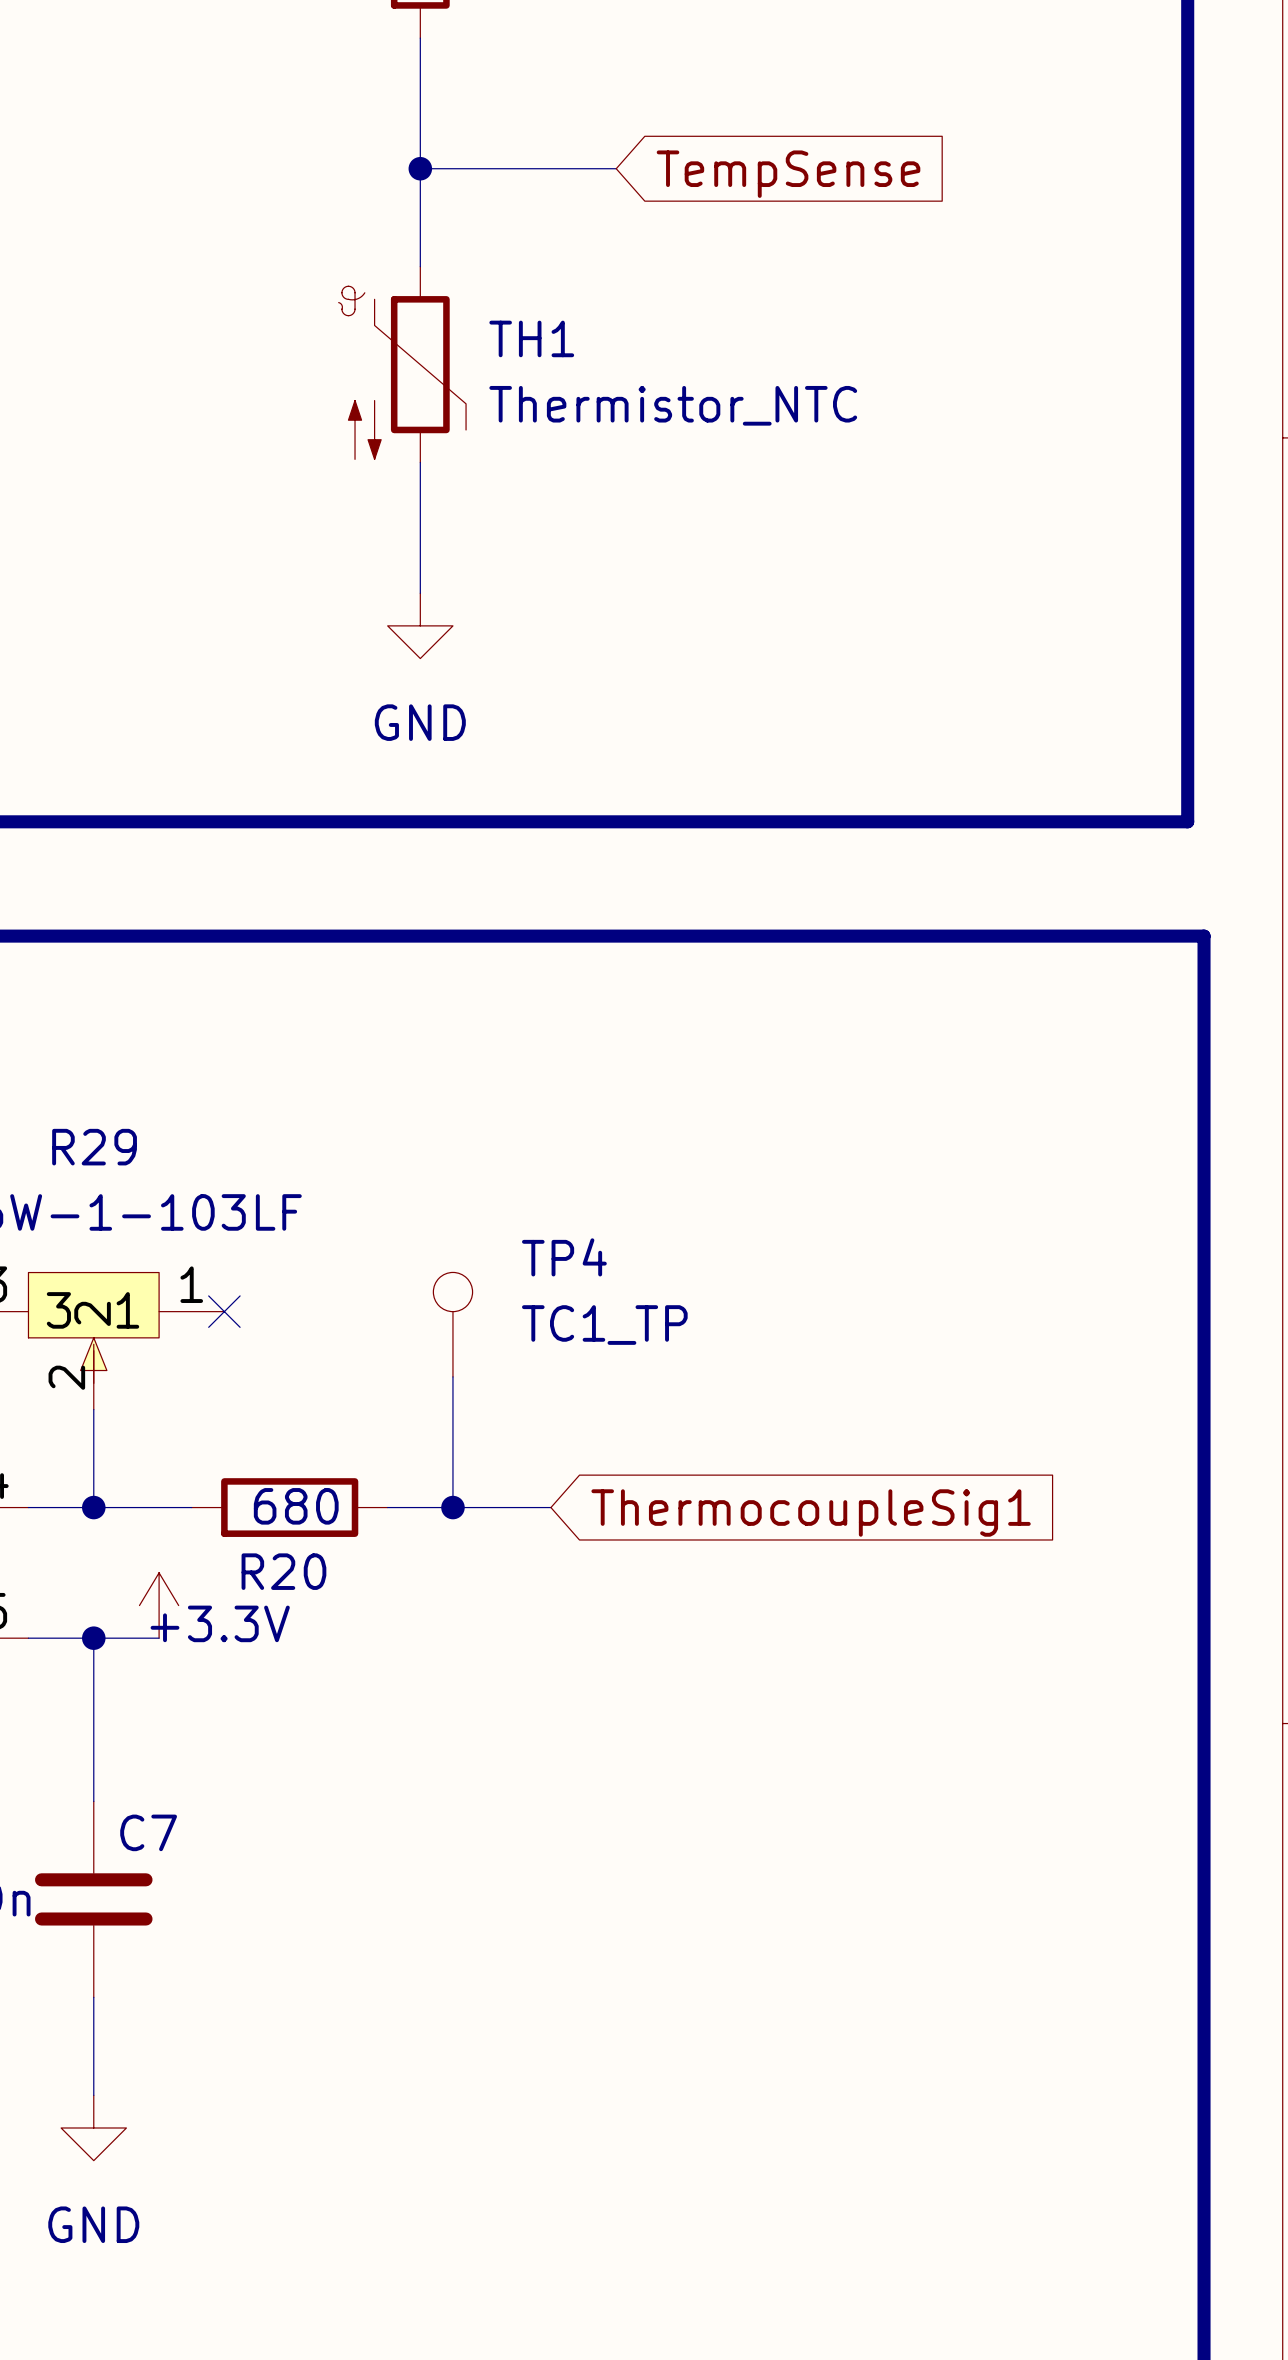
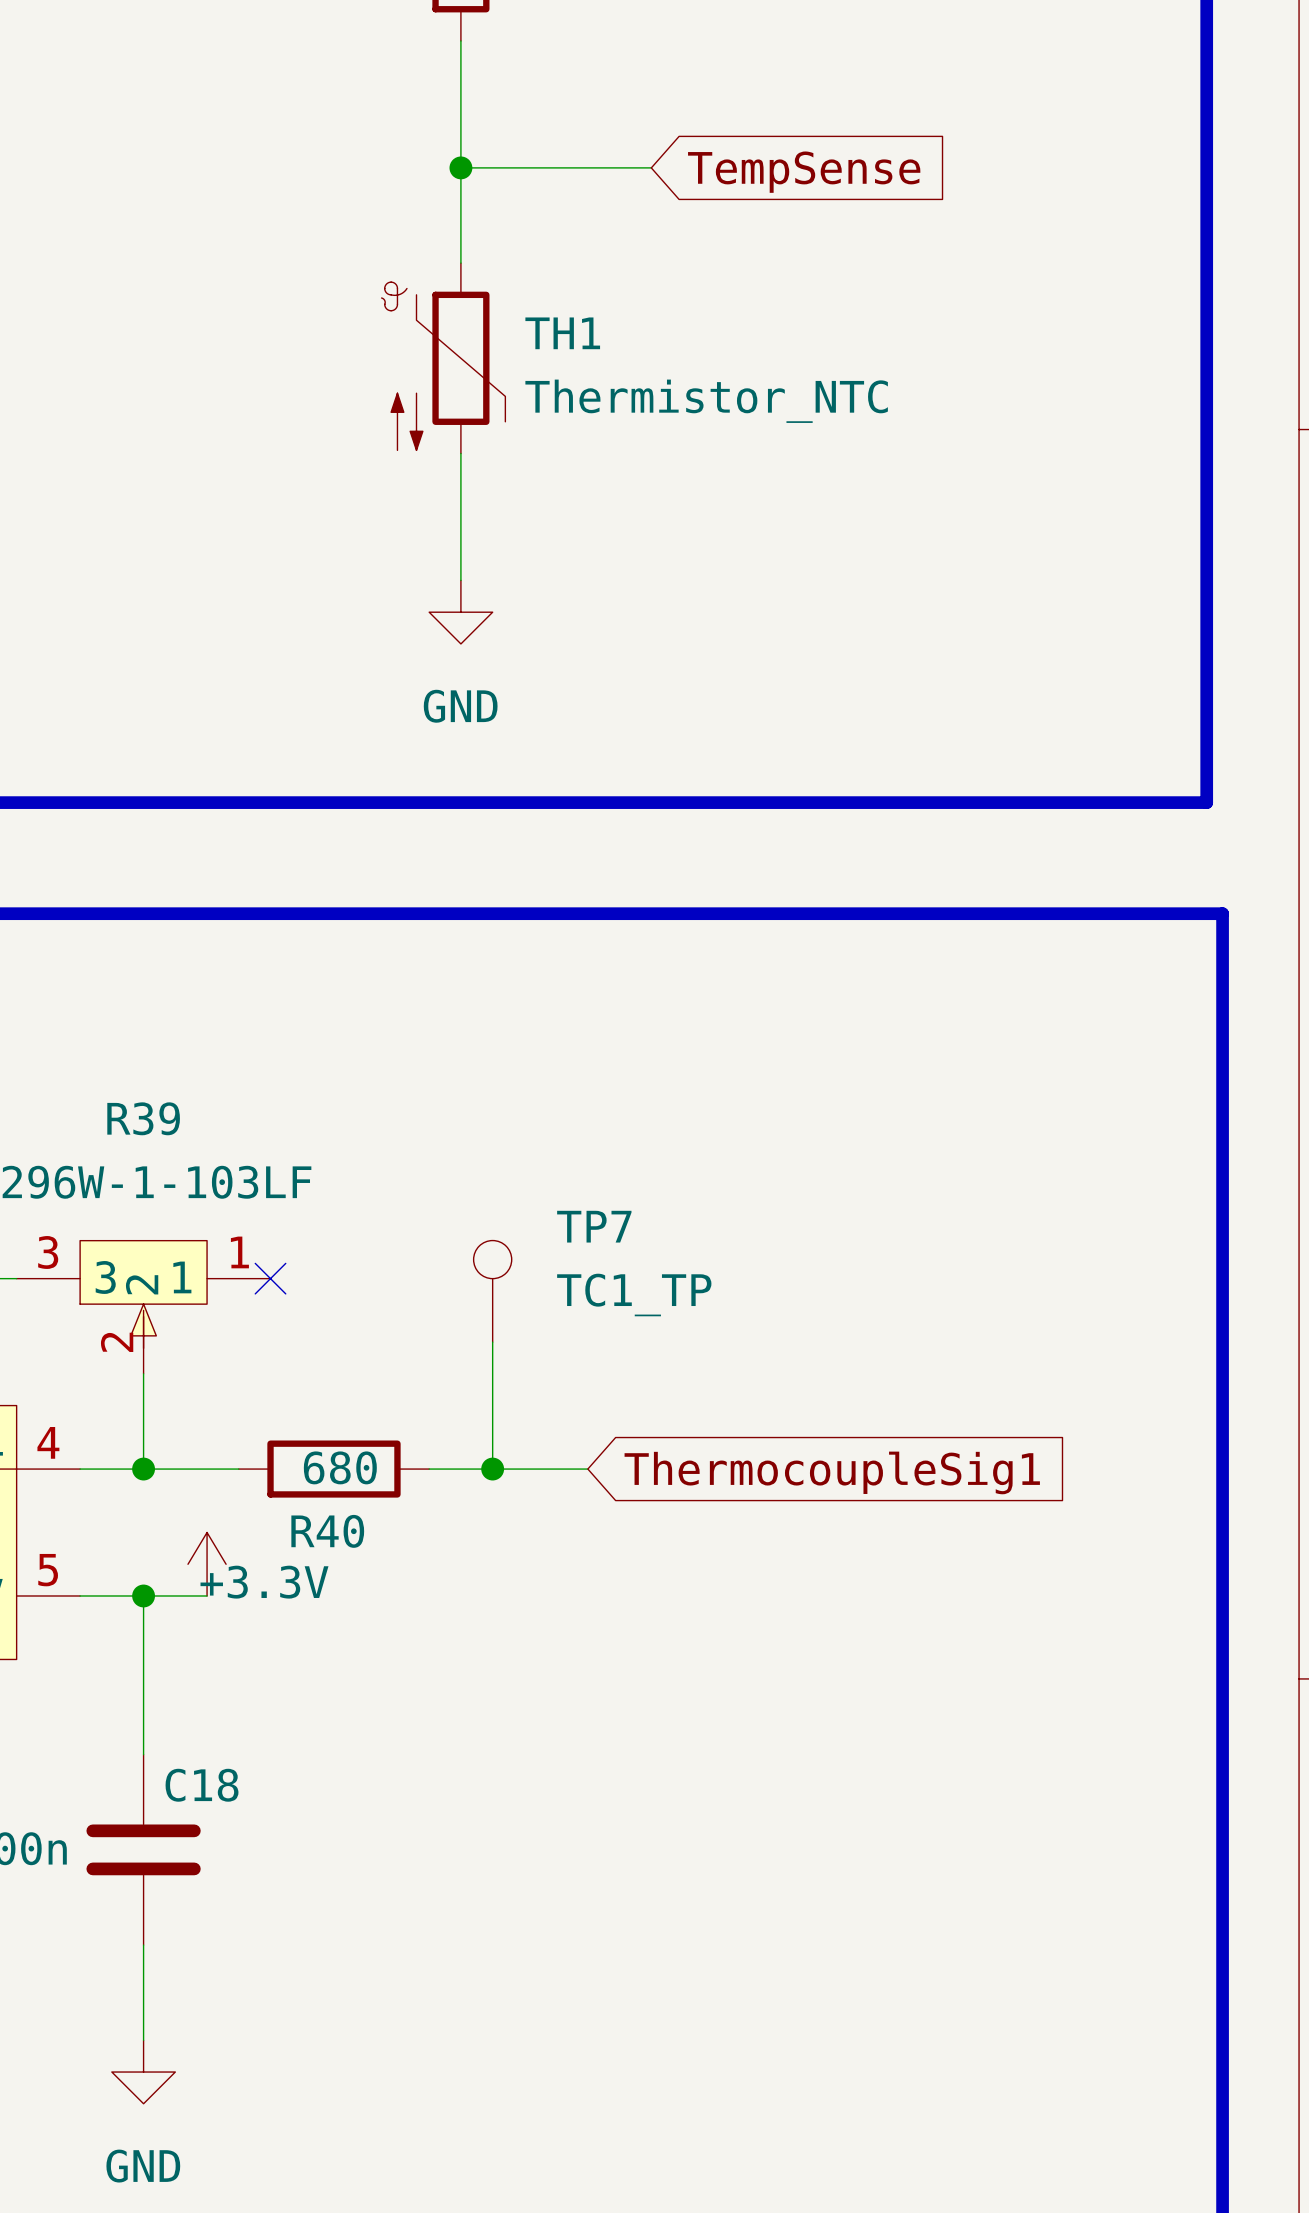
R29 name: R29 (94, 1147) -> R39 (143, 1118)
TP4 name: TP4 (564, 1257) -> TP7 (594, 1226)
R20 name: R20 (283, 1571) -> R40 (327, 1531)
C7 name: C7 (148, 1832) -> C18 (202, 1785)

